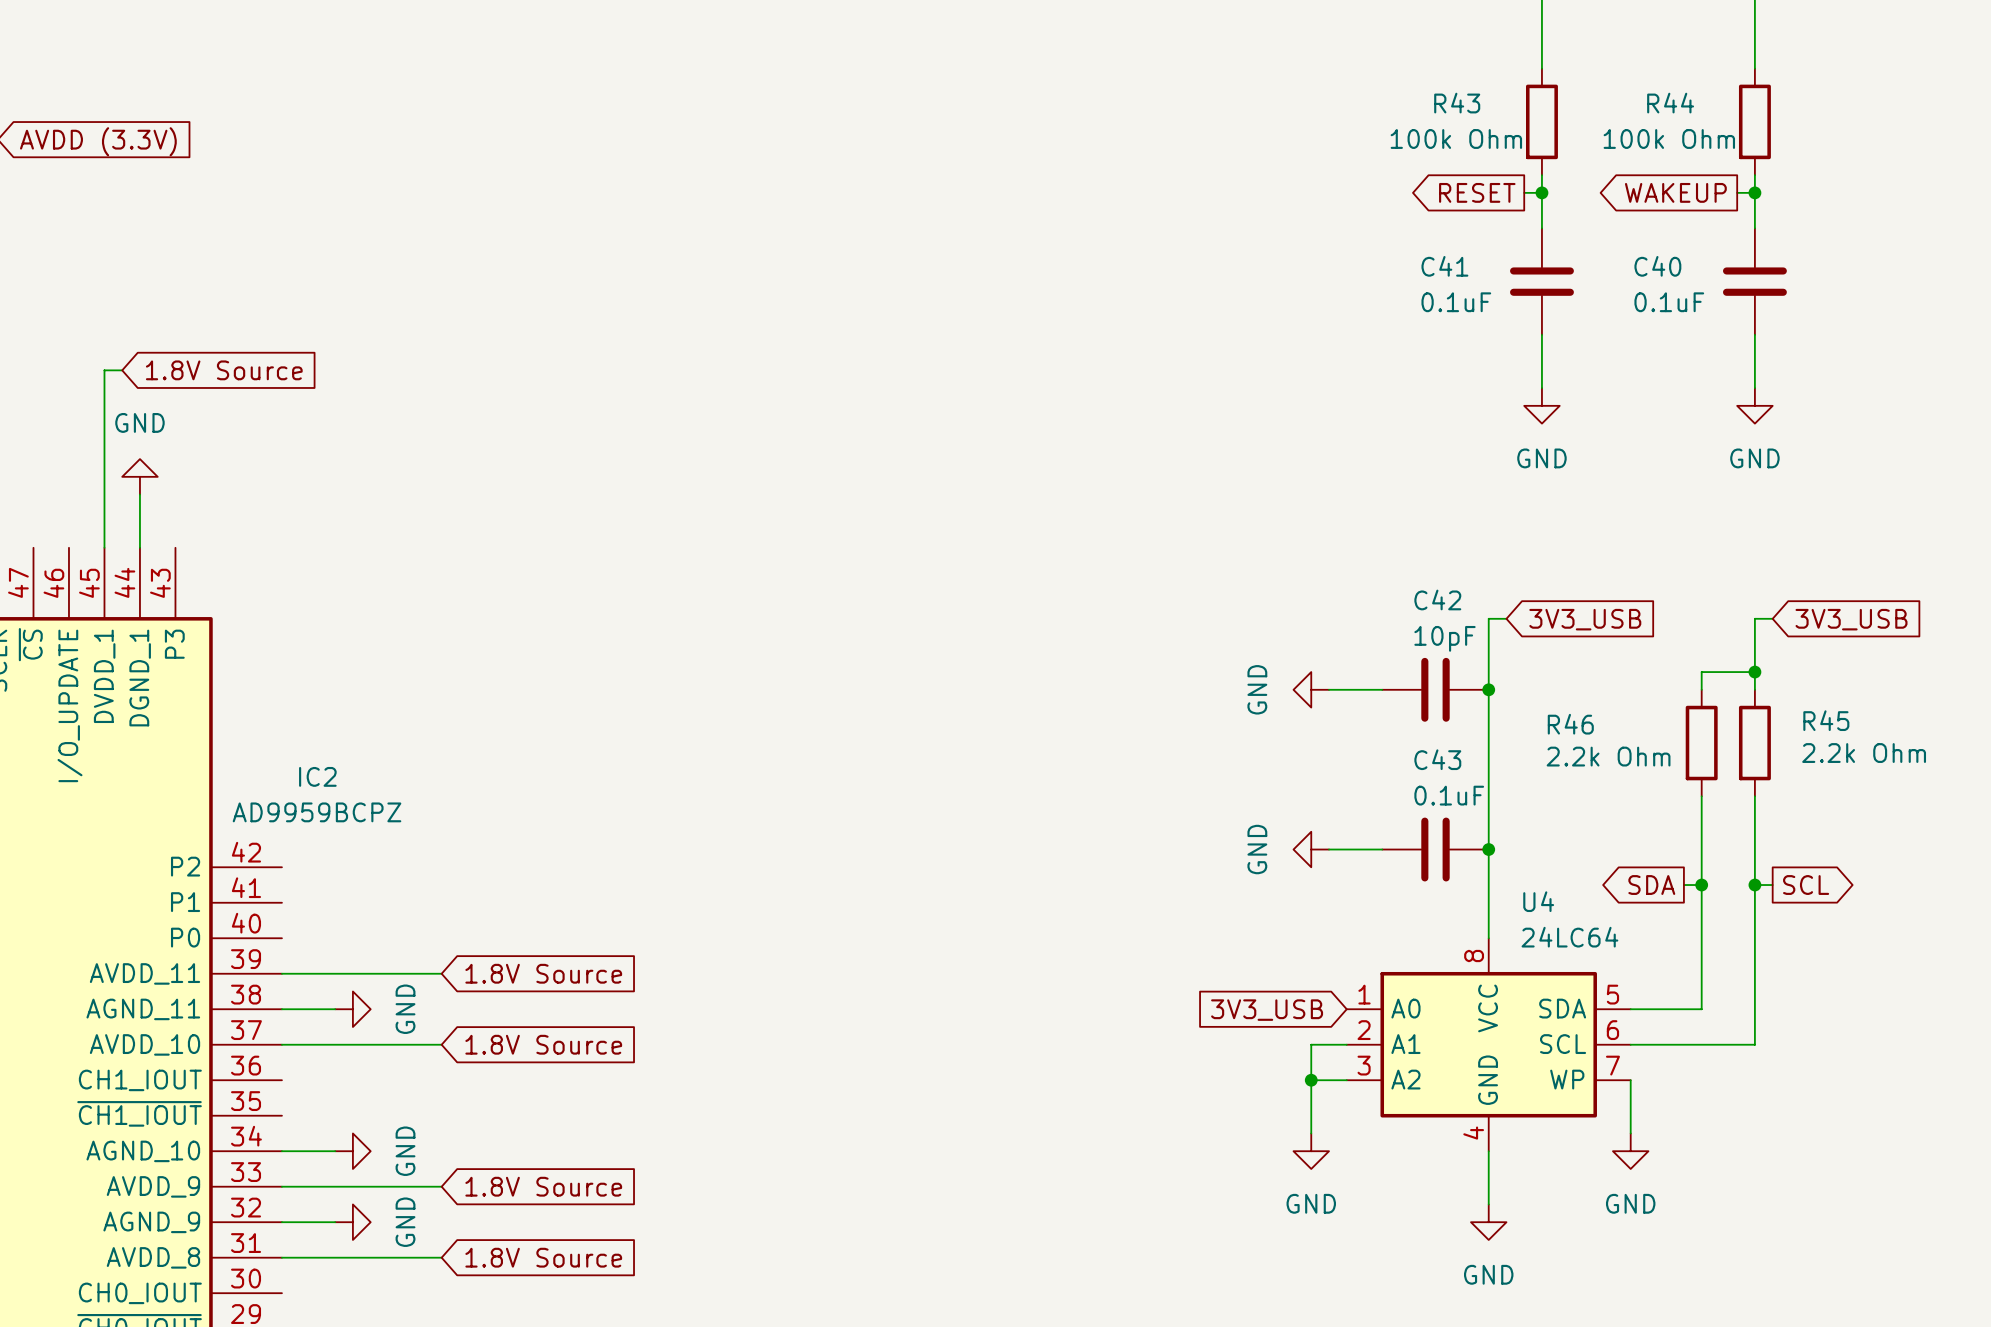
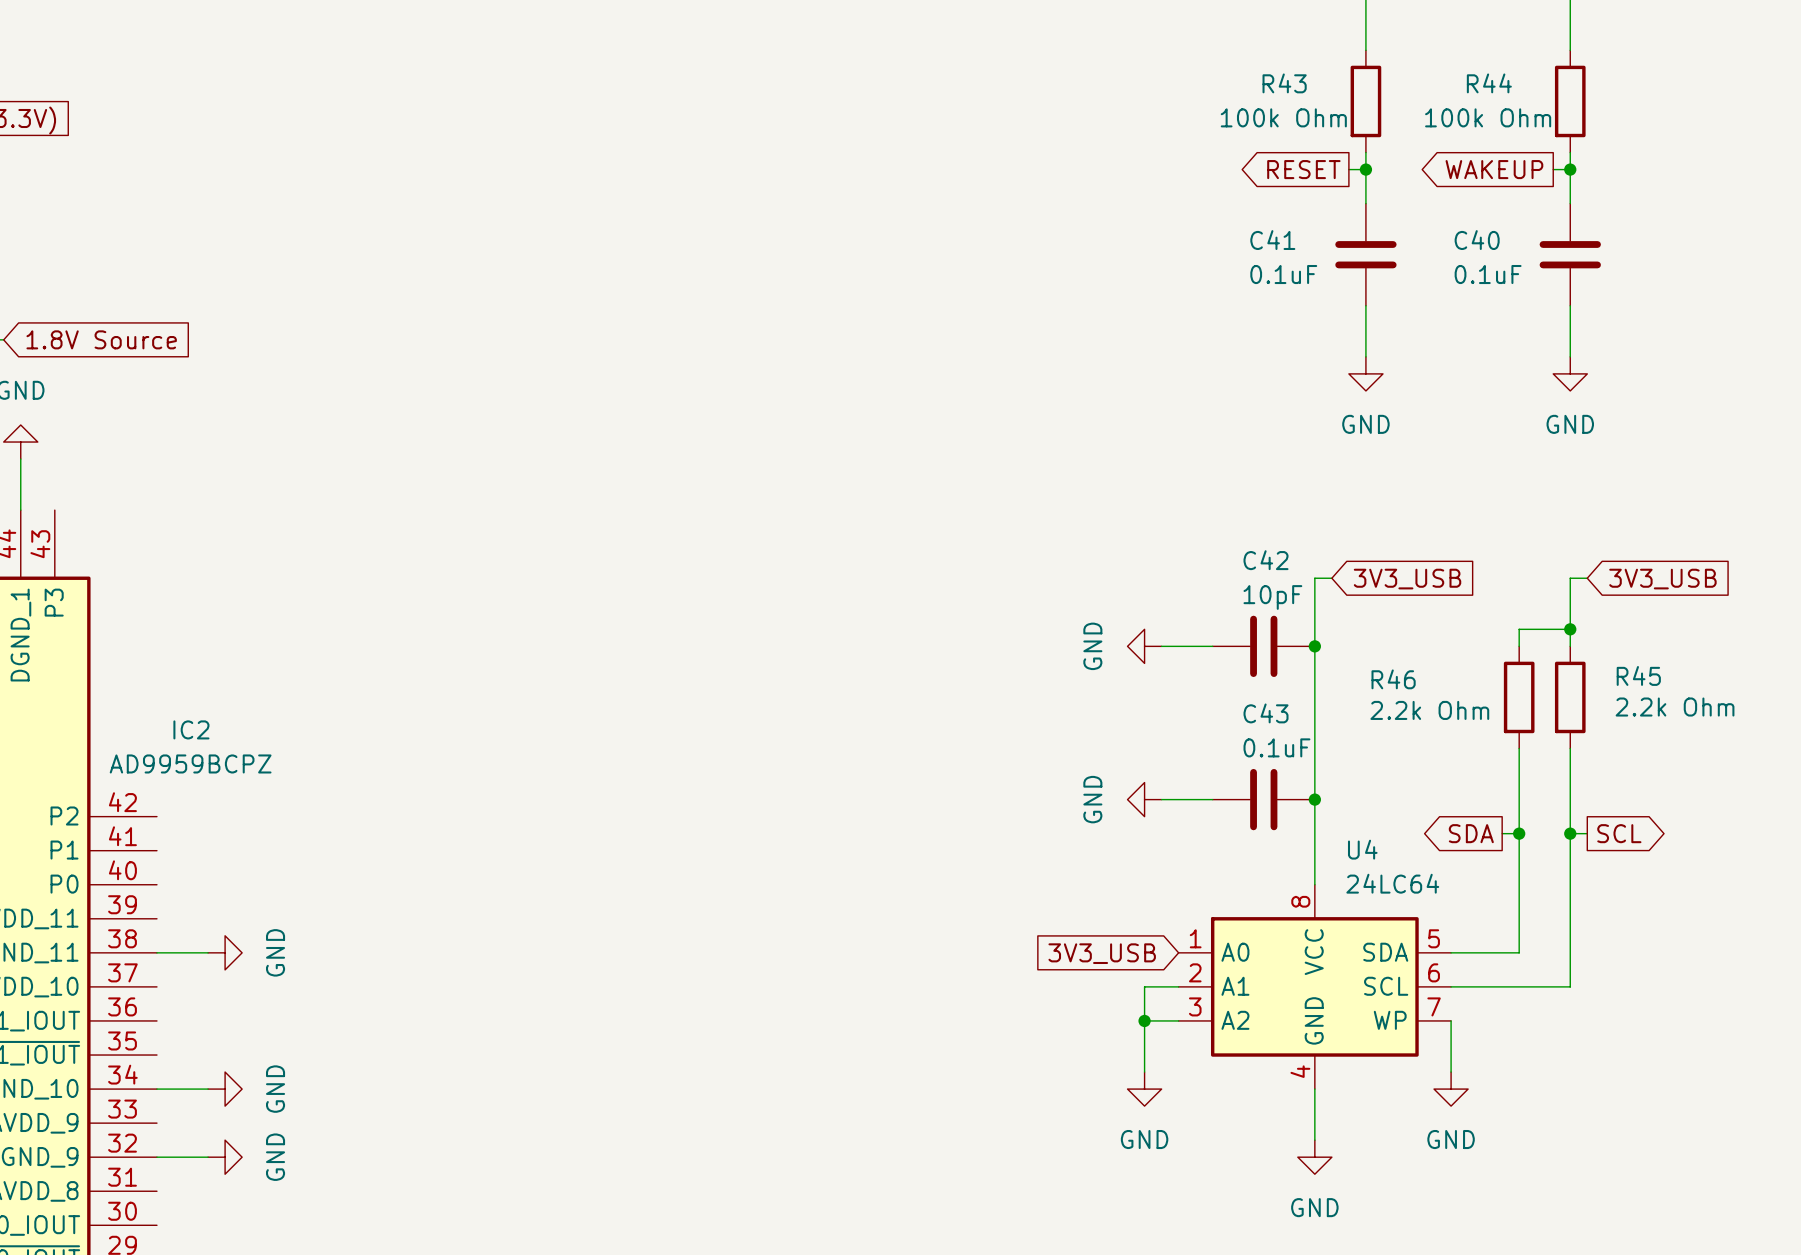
wire: (281, 973) (441, 973) -> none
global label: 1.8V Source (543, 973) -> none
wire: (281, 1044) (441, 1044) -> none
global label: 1.8V Source (543, 1044) -> none
wire: (281, 1186) (441, 1186) -> none
global label: 1.8V Source (543, 1186) -> none
wire: (281, 1257) (441, 1257) -> none
global label: 1.8V Source (543, 1257) -> none

